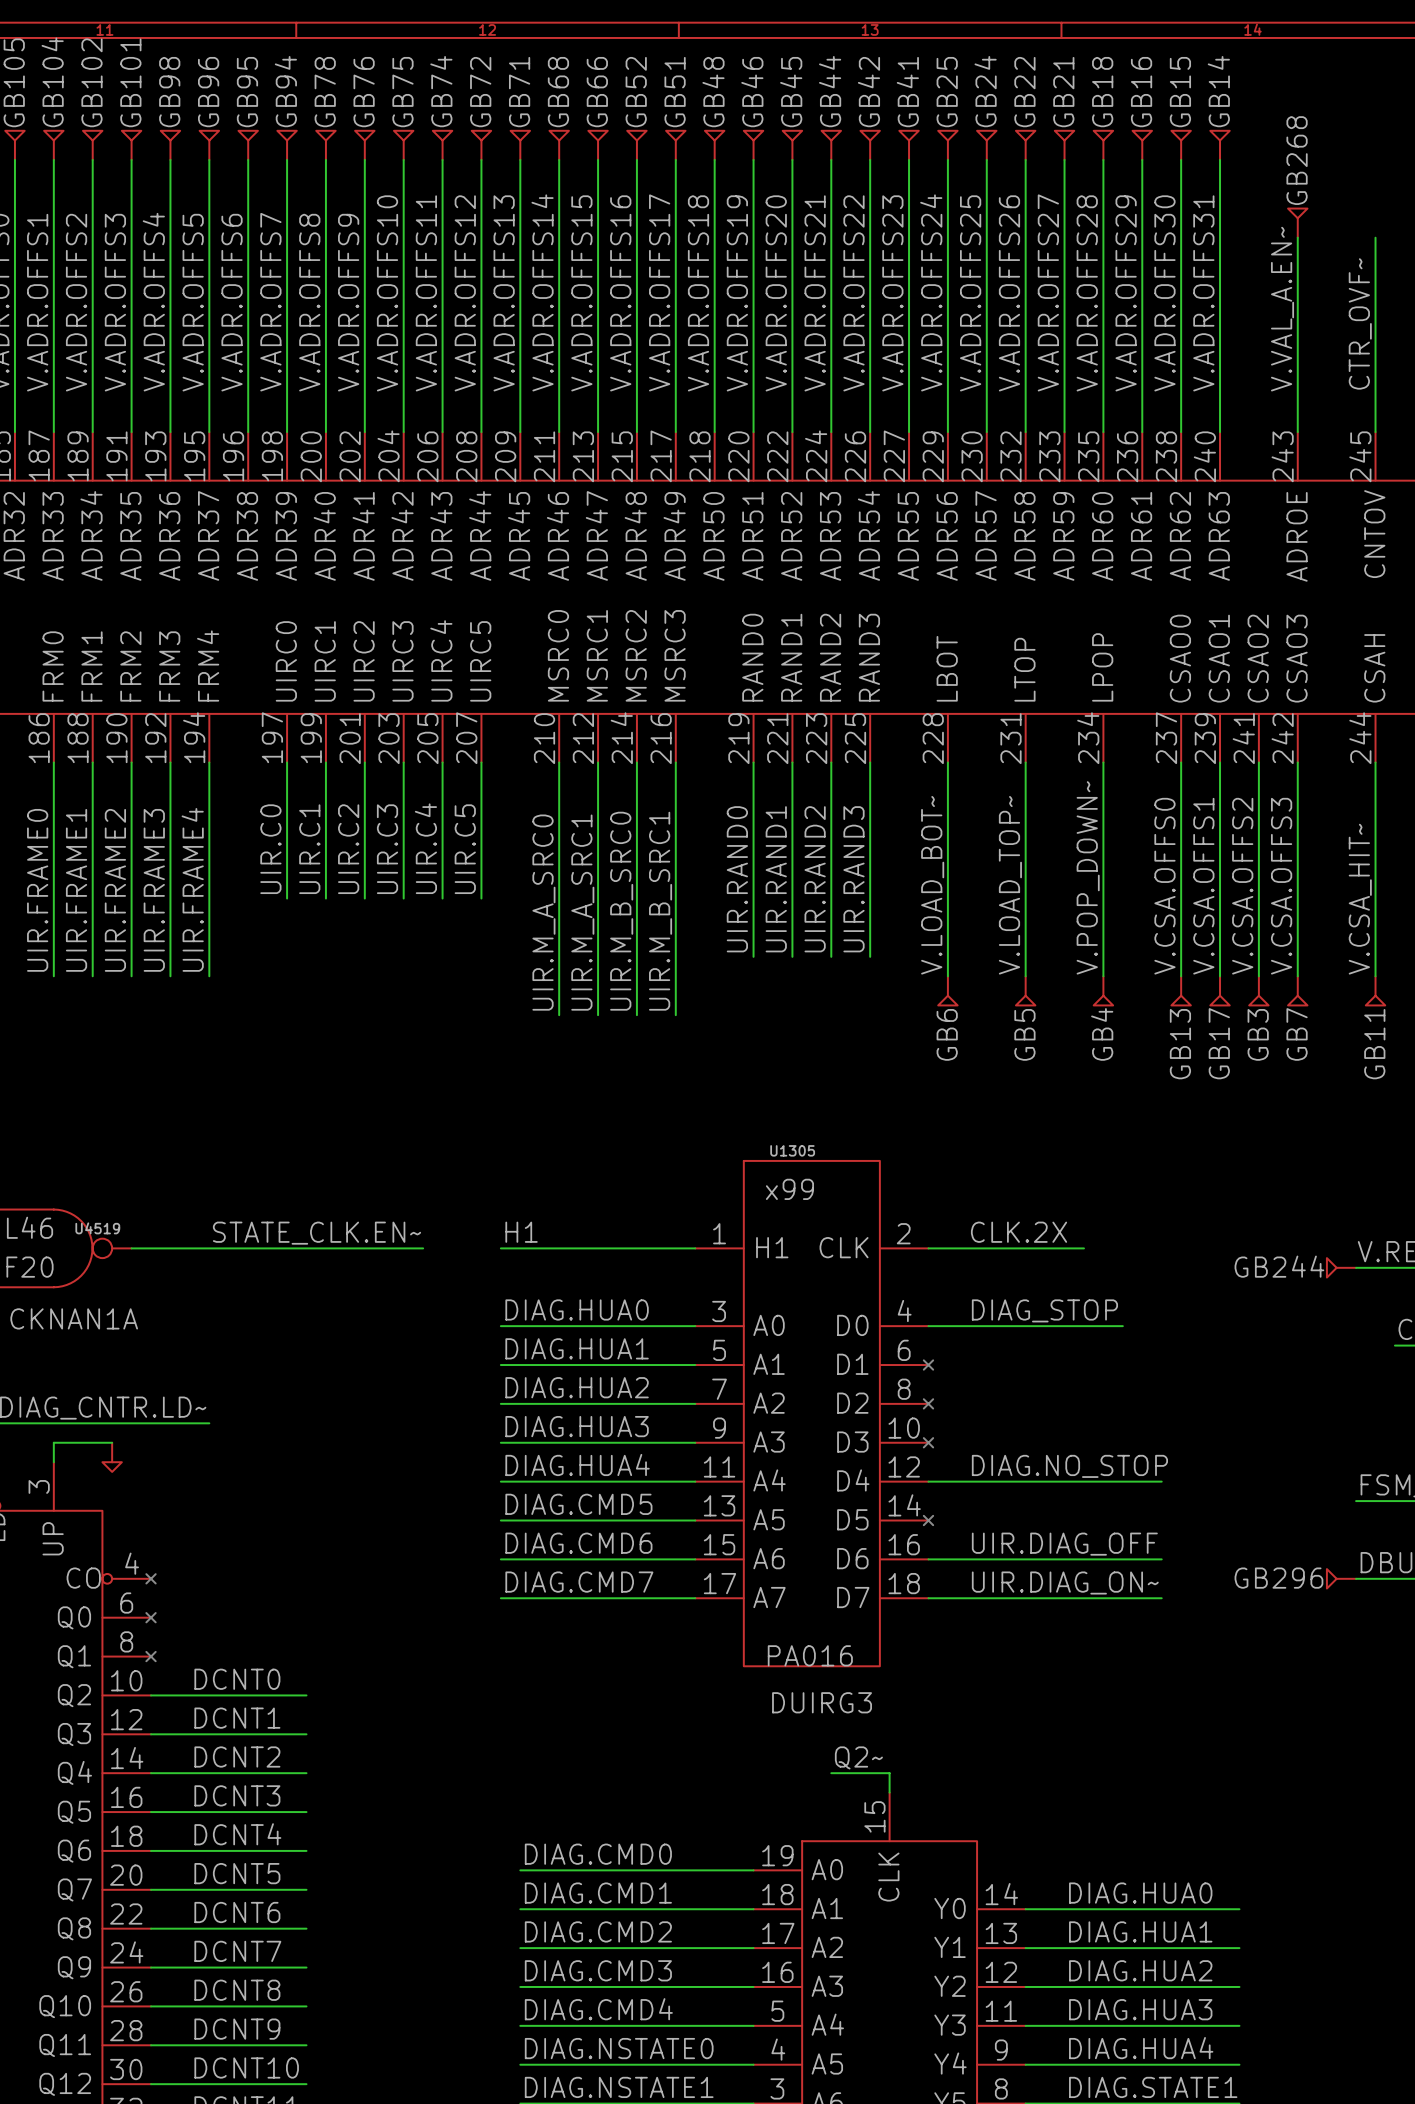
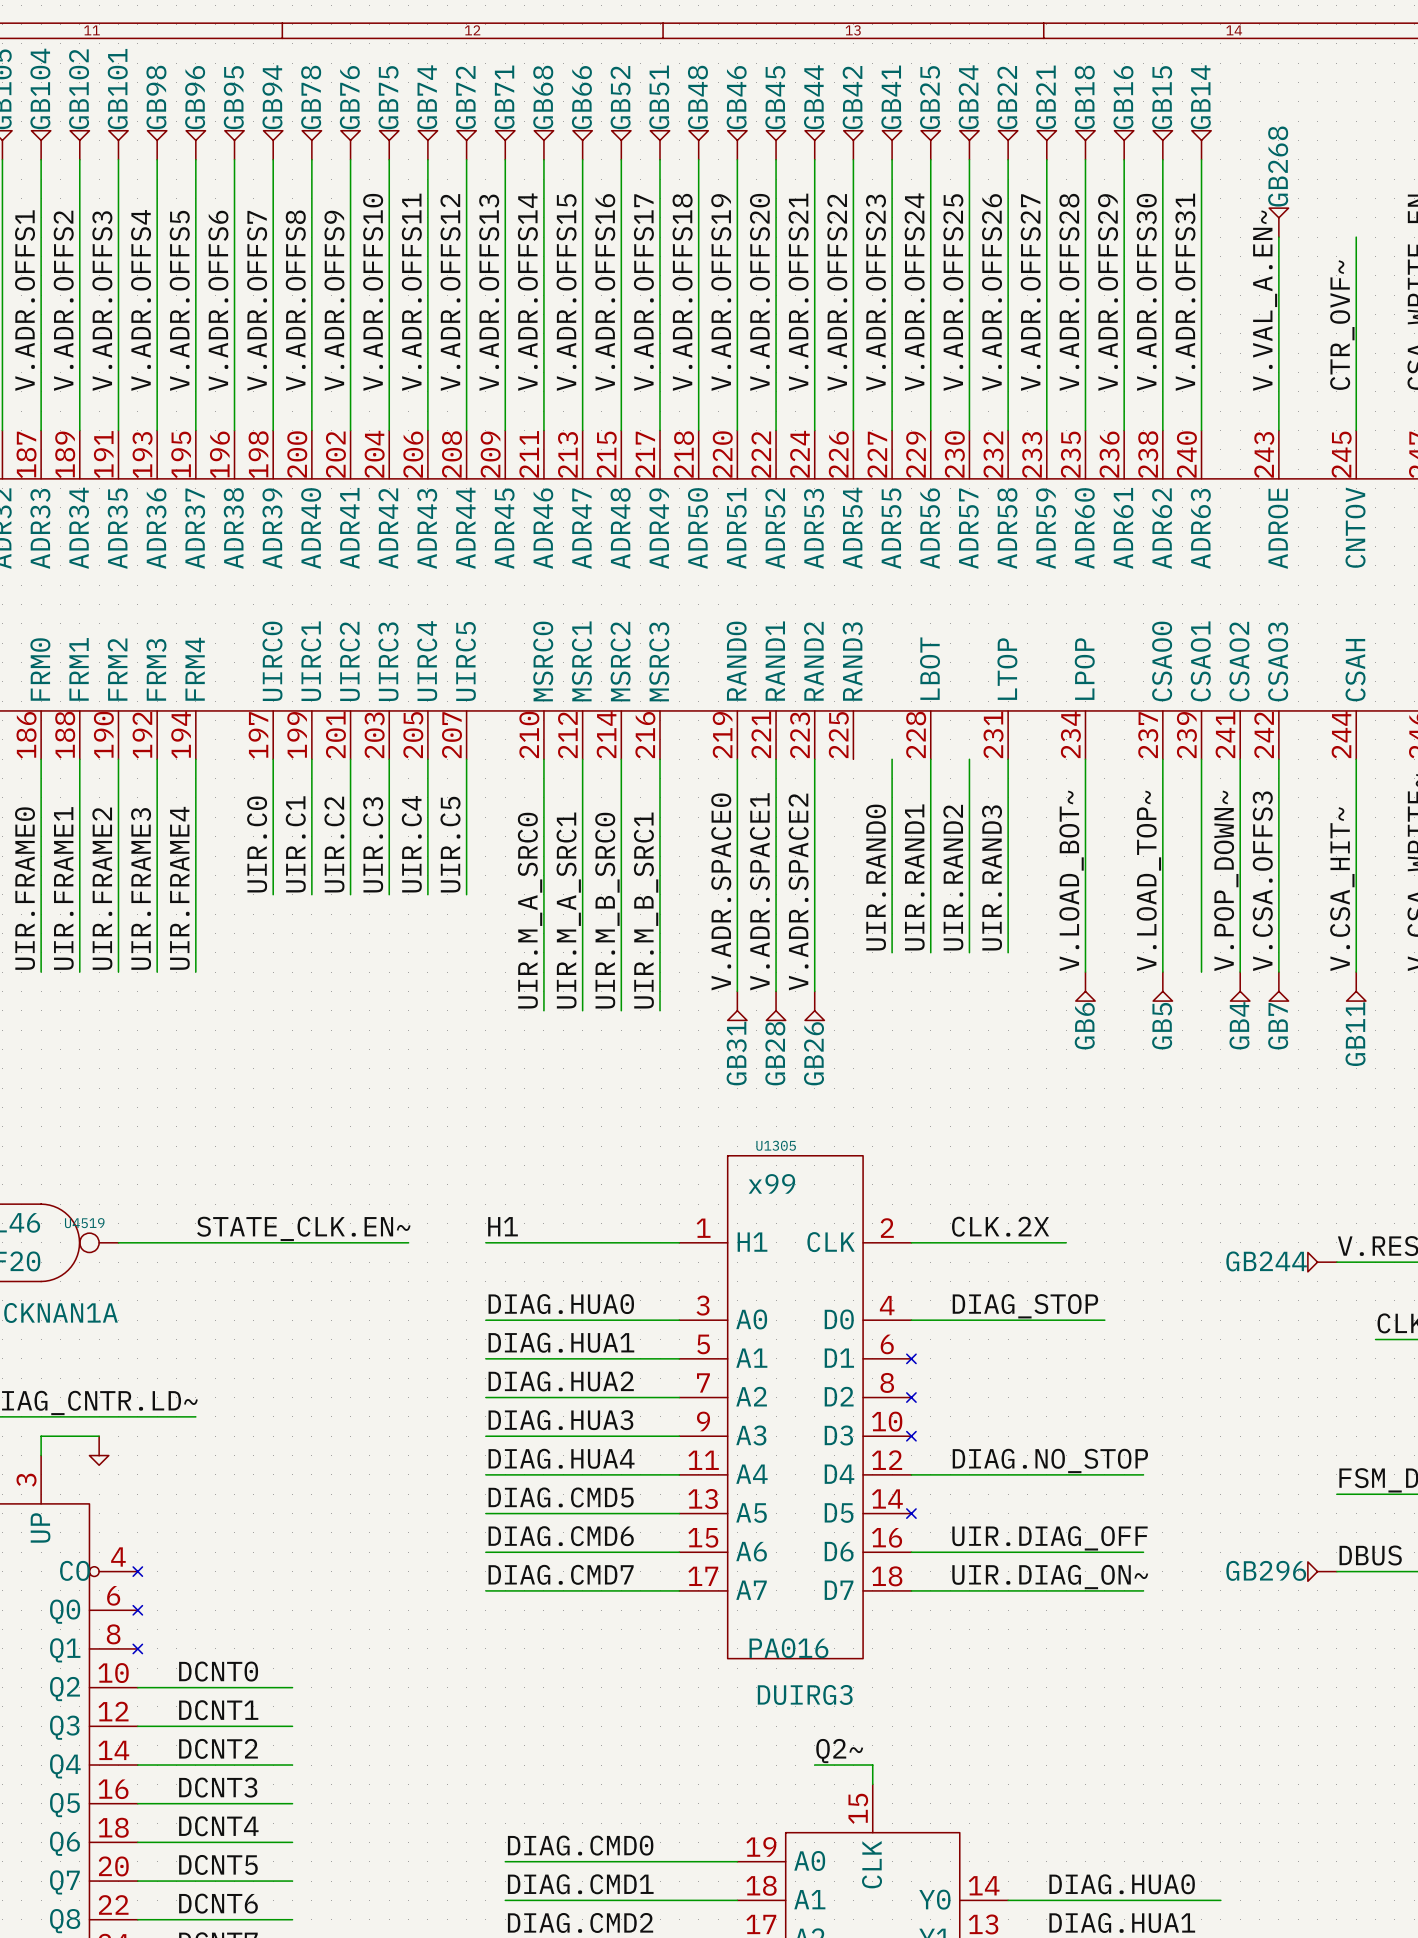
wire: (870, 762) (870, 956) -> (892, 759) (892, 952)
wire: none -> (969, 759) (969, 952)
label: V.POP_DOWN~ (1088, 877) -> V.LOAD_BOT~ (1071, 880)
label position: UIR.RAND0 (737, 879) -> UIR.RAND0 (875, 877)
label position: UIR.RAND1 (776, 879) -> UIR.RAND1 (914, 877)
label position: UIR.RAND2 (815, 879) -> UIR.RAND2 (953, 877)
label position: UIR.RAND3 (853, 879) -> UIR.RAND3 (992, 877)
label: V.LOAD_BOT~ (932, 885) -> none
label: V.LOAD_TOP~ (1010, 885) -> none
label: V.CSA.OFFS0 (1164, 886) -> V.LOAD_TOP~ (1148, 880)
label: V.CSA.OFFS1 (1203, 886) -> none
label: V.CSA.OFFS2 (1242, 886) -> V.POP_DOWN~ (1226, 880)
label: none -> V.ADR.SPACE0 (721, 891)
label: none -> V.ADR.SPACE1 (759, 891)
label: none -> V.ADR.SPACE2 (798, 892)
wire: none -> (737, 952) (737, 991)
wire: none -> (776, 952) (776, 991)
wire: none -> (814, 952) (814, 991)
wire: (947, 956) (947, 976) -> none
wire: (1025, 956) (1025, 976) -> none
GB6: (947, 991) -> none
GB5: (1025, 991) -> none
GB17: (1220, 991) -> none
GB31: none -> (737, 1006)
GB28: none -> (776, 1006)
GB26: none -> (814, 1006)
GB4 name: GB4 (1102, 1034) -> GB6 (1084, 1026)
GB3 name: GB3 (1258, 1034) -> GB4 (1239, 1025)
GB13 name: GB13 (1180, 1044) -> GB5 (1162, 1026)

